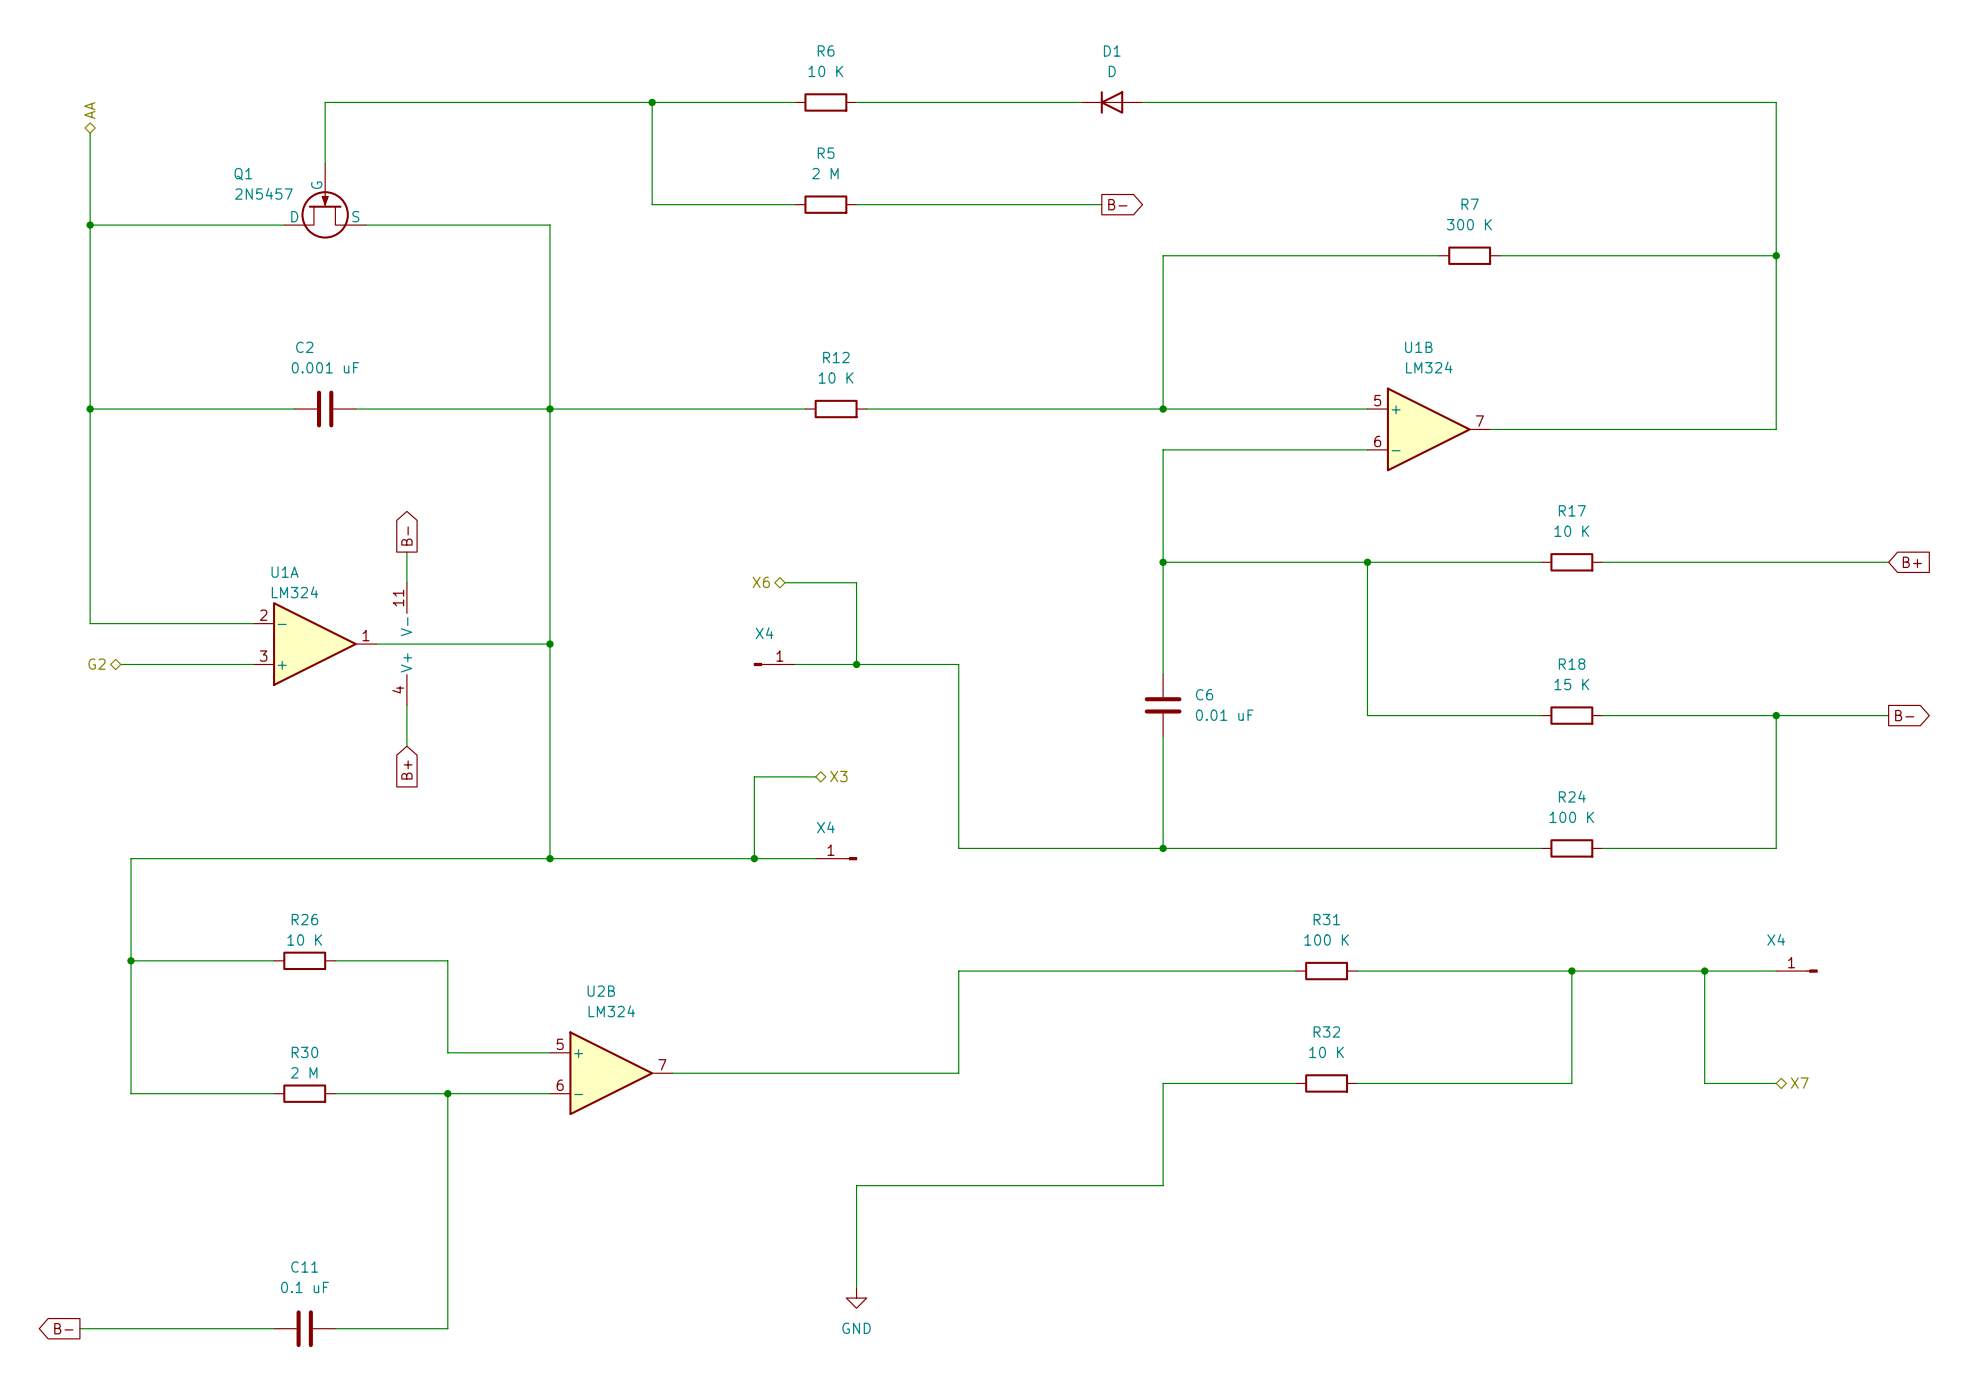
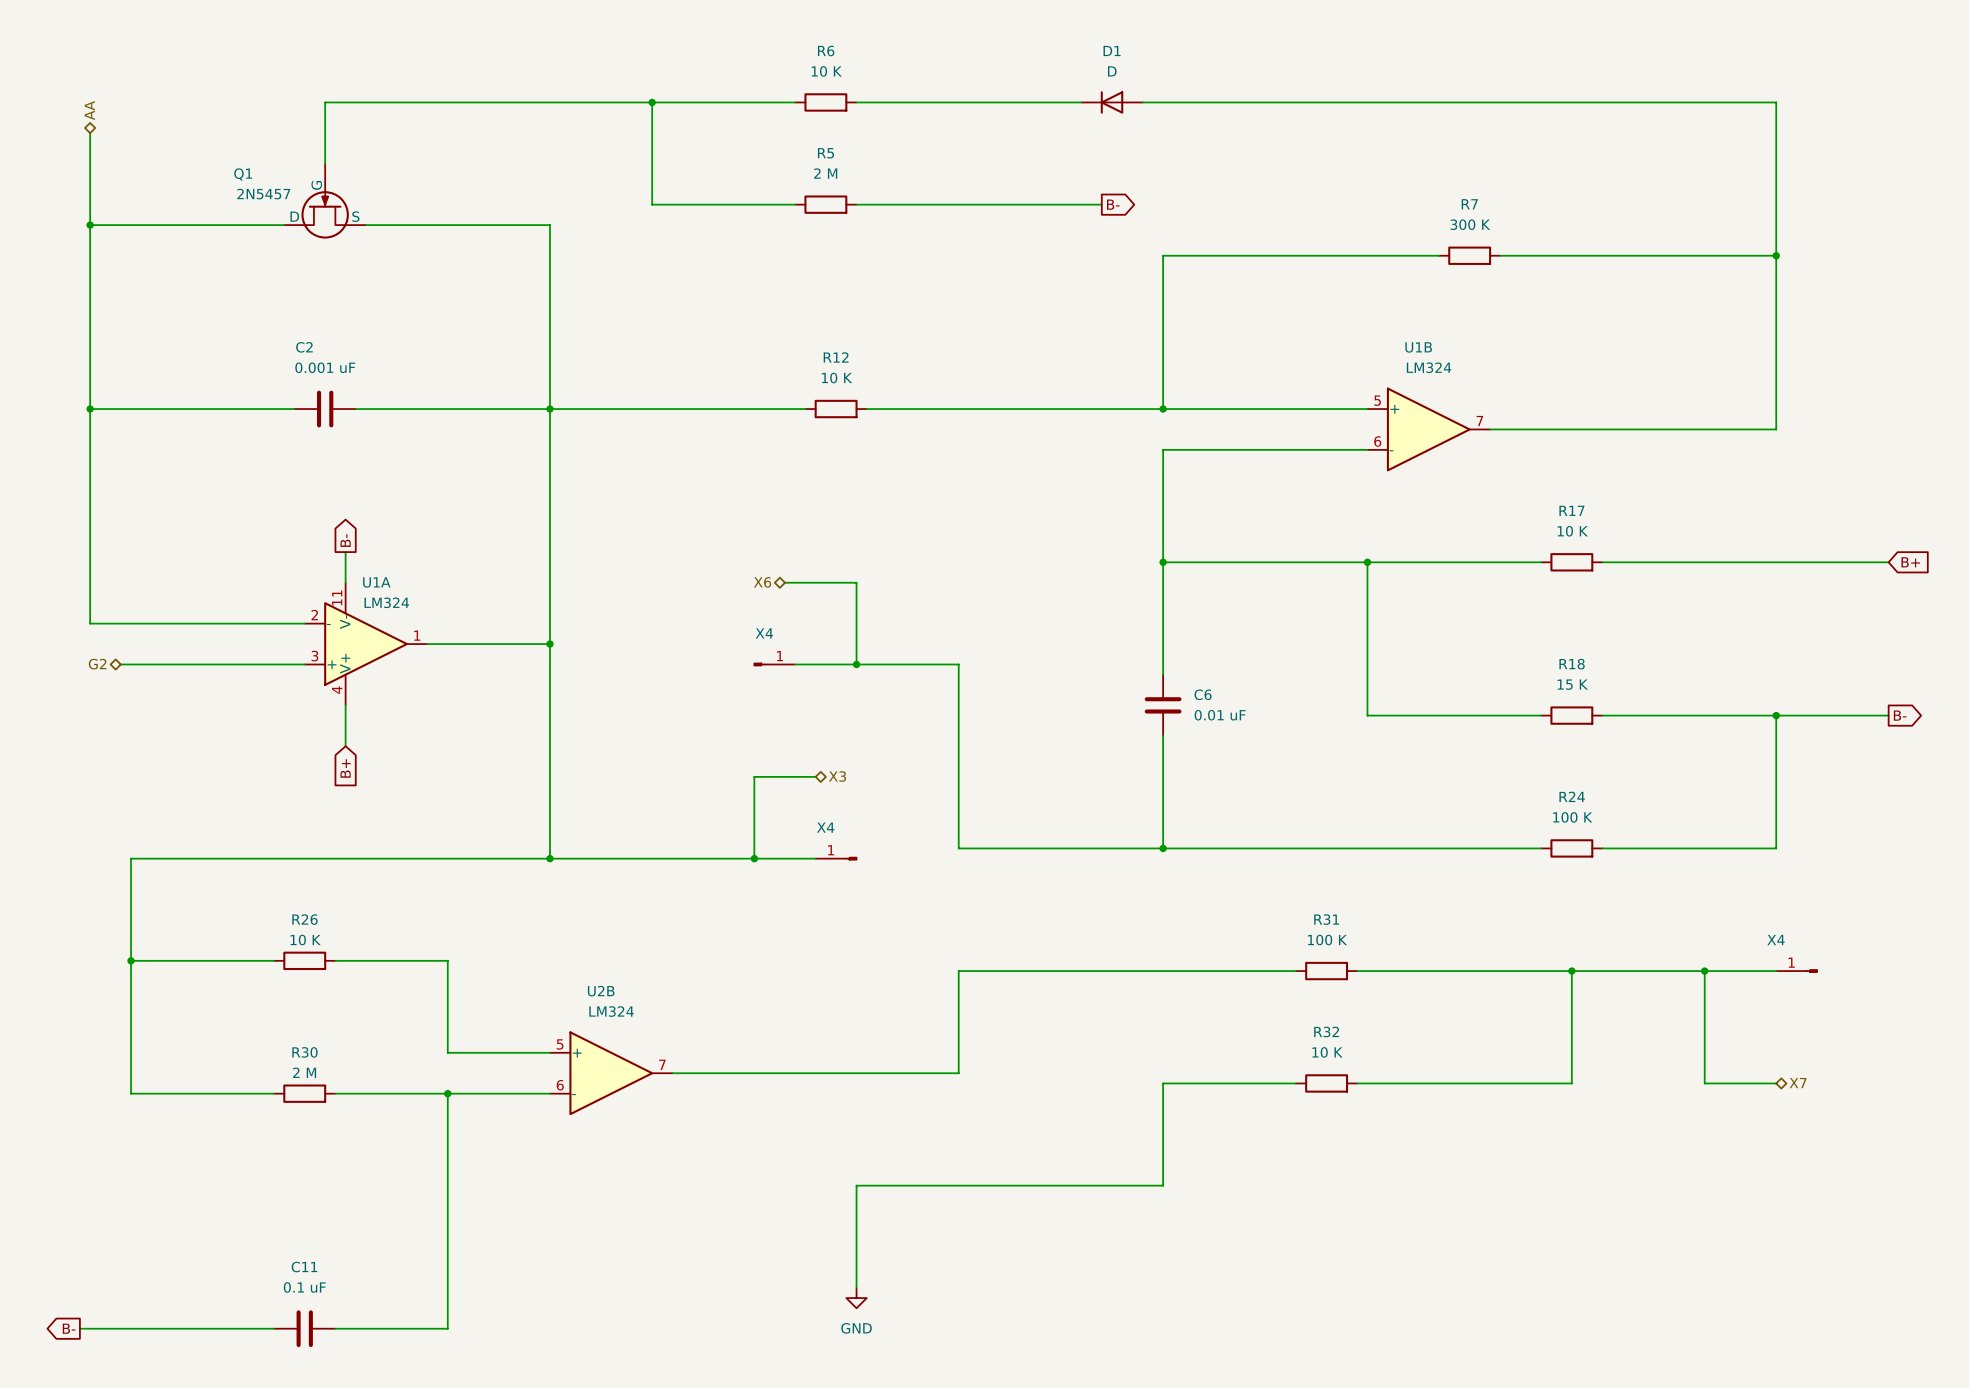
global label position: B- (406, 536) -> B- (345, 540)
wire: (406, 552) (406, 582) -> (345, 552) (345, 582)
U1A name position: U1A (285, 572) -> U1A (376, 582)
U1A value position: LM324 (295, 592) -> LM324 (386, 602)
U1A position: (314, 644) -> (366, 644)
part position: (406, 644) -> (345, 644)
wire: (406, 705) (406, 746) -> (345, 705) (345, 746)
global label position: B+ (406, 769) -> B+ (345, 768)

